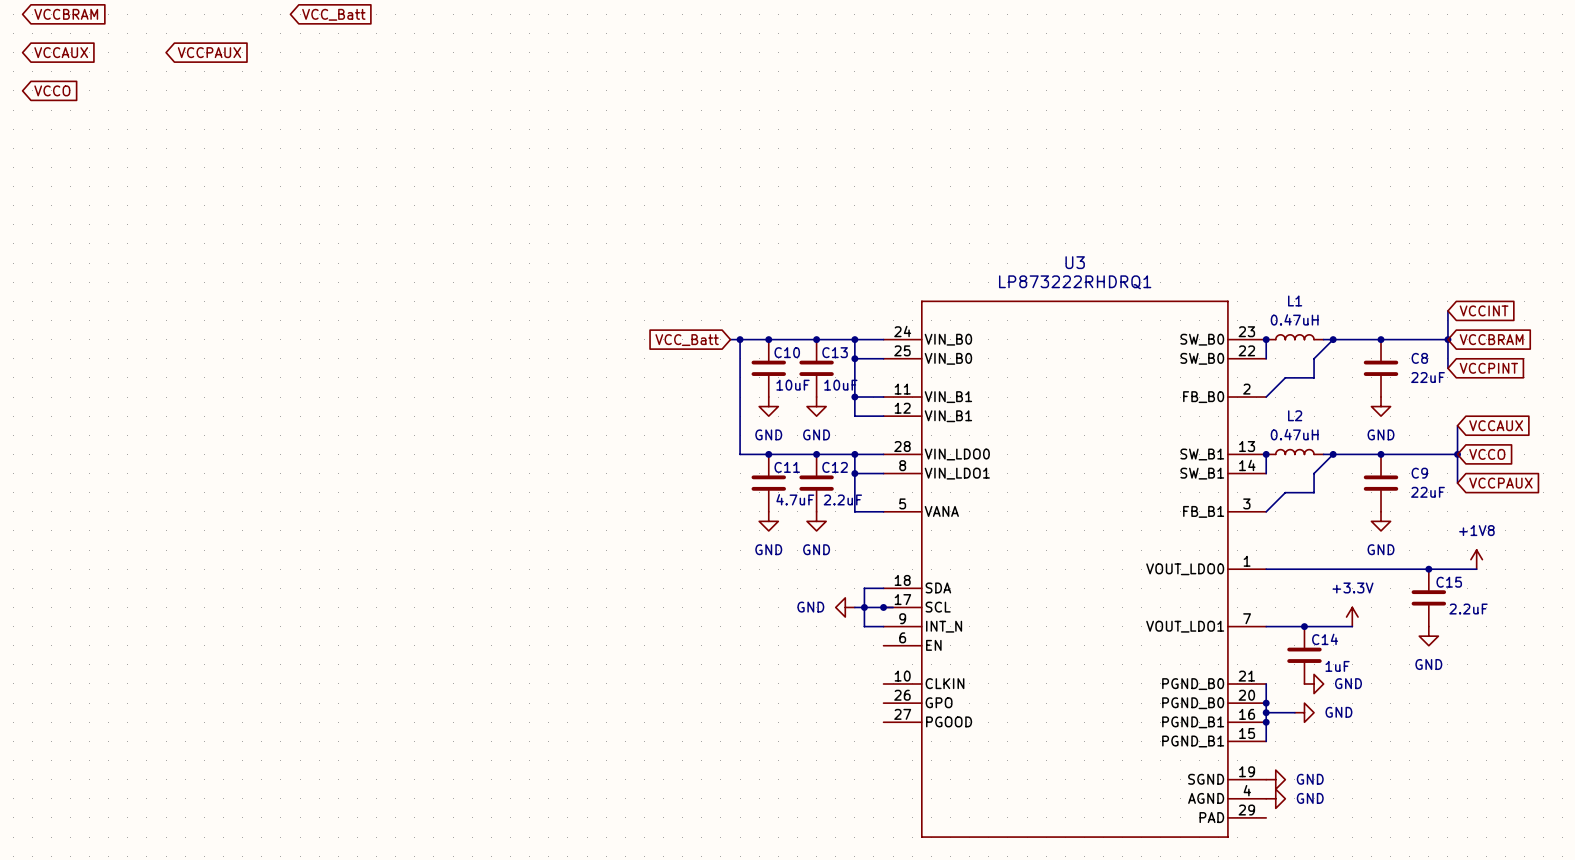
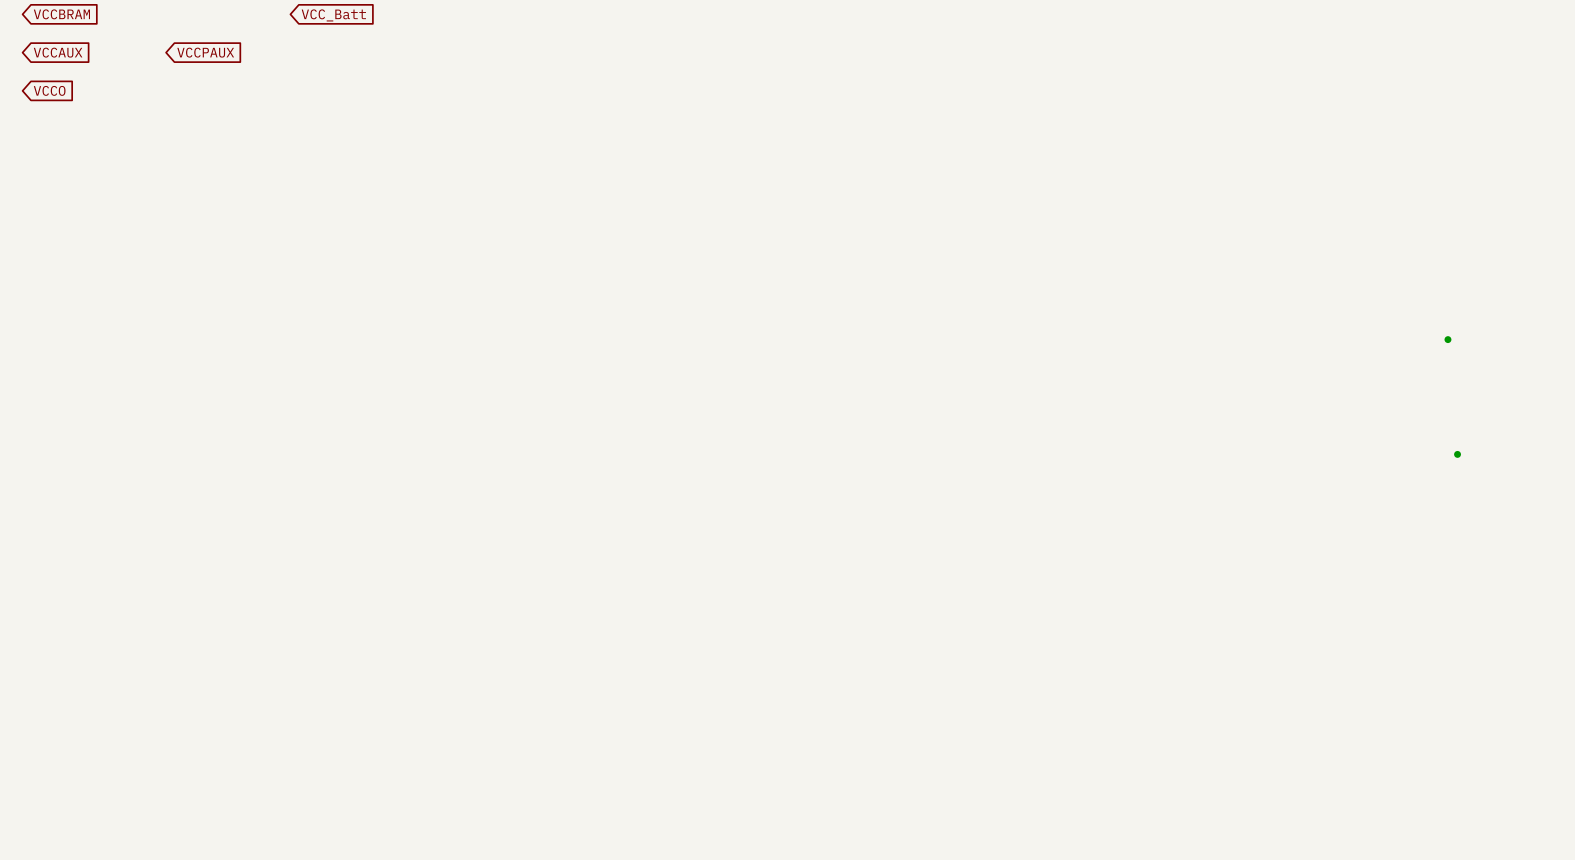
wire: (1447, 310) (1447, 368) -> none
global label: VCCINT (1484, 310) -> none
L1: 0.47uH (1294, 337) -> none
wire: (730, 339) (883, 339) -> none
wire: (740, 339) (740, 454) (883, 454) -> none
junction: (740, 339) -> none
junction: (768, 339) -> none
junction: (816, 339) -> none
wire: (854, 339) (854, 416) (883, 416) -> none
junction: (854, 339) -> none
wire: (1266, 339) (1266, 358) -> none
junction: (1266, 339) -> none
wire: (1323, 339) (1447, 339) -> none
wire: (1333, 339) (1314, 358) (1314, 377) (1285, 377) (1266, 397) -> none
junction: (1333, 339) -> none
junction: (1381, 339) -> none
global label: VCCBRAM (1491, 339) -> none
global label: VCC_Batt (687, 340) -> none
wire: (854, 358) (883, 358) -> none
junction: (854, 358) -> none
C10: 10uF (768, 368) -> none
C13: 10uF (816, 368) -> none
C8: 22uF (1381, 368) -> none
global label: VCCPINT (1488, 368) -> none
wire: (854, 397) (883, 397) -> none
junction: (854, 397) -> none
power symbol: GND (768, 406) -> none
power symbol: GND (816, 406) -> none
power symbol: GND (1381, 406) -> none
wire: (1457, 425) (1457, 483) -> none
global label: VCCAUX (1496, 425) -> none
L2: 0.47uH (1294, 452) -> none
junction: (768, 454) -> none
junction: (816, 454) -> none
wire: (854, 454) (854, 511) (883, 511) -> none
junction: (854, 454) -> none
wire: (1266, 454) (1266, 473) -> none
junction: (1266, 454) -> none
wire: (1323, 454) (1457, 454) -> none
wire: (1333, 454) (1314, 473) (1314, 492) (1285, 492) (1266, 511) -> none
junction: (1333, 454) -> none
junction: (1381, 454) -> none
global label: VCCO (1487, 454) -> none
wire: (854, 473) (883, 473) -> none
junction: (854, 473) -> none
C11: 4.7uF (768, 483) -> none
C12: 2.2uF (816, 483) -> none
C9: 22uF (1381, 483) -> none
global label: VCCPAUX (1500, 483) -> none
power symbol: GND (768, 521) -> none
power symbol: GND (816, 521) -> none
power symbol: GND (1381, 521) -> none
power symbol: +1V8 (1476, 559) -> none
U3: LP873222RHDRQ1 (1074, 569) -> none
wire: (1266, 569) (1476, 569) -> none
junction: (1428, 569) -> none
wire: (883, 588) (864, 588) (864, 626) (883, 626) -> none
C15: 2.2uF (1428, 597) -> none
power symbol: GND (845, 607) -> none
wire: (854, 607) (893, 607) -> none
junction: (864, 607) -> none
junction: (883, 607) -> none
power symbol: +3.3V (1352, 617) -> none
wire: (1266, 626) (1352, 626) -> none
junction: (1304, 626) -> none
power symbol: GND (1428, 636) -> none
C14: 1uF (1304, 655) -> none
wire: (1266, 683) (1266, 741) -> none
power symbol: GND (1314, 683) -> none
junction: (1266, 703) -> none
wire: (1266, 712) (1294, 712) -> none
junction: (1266, 712) -> none
power symbol: GND (1304, 712) -> none
junction: (1266, 722) -> none
power symbol: GND (1275, 779) -> none
power symbol: GND (1275, 798) -> none

